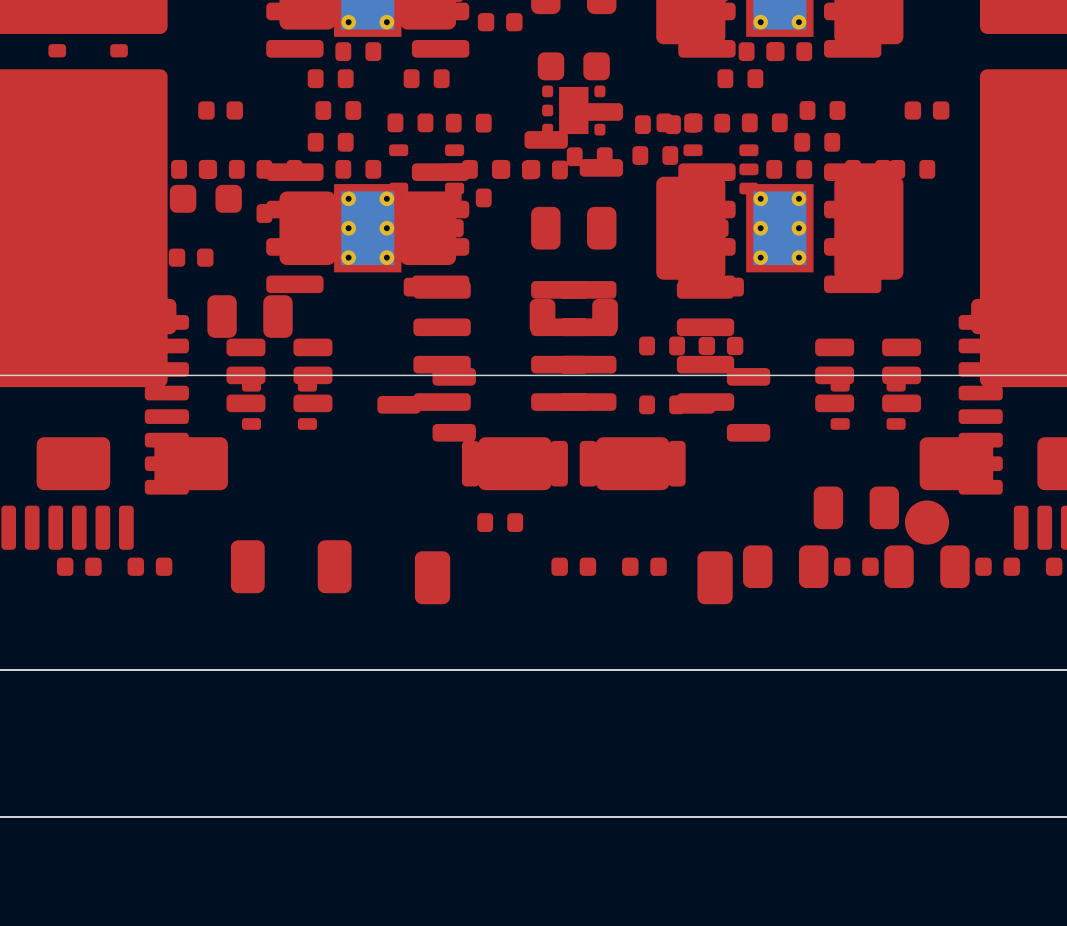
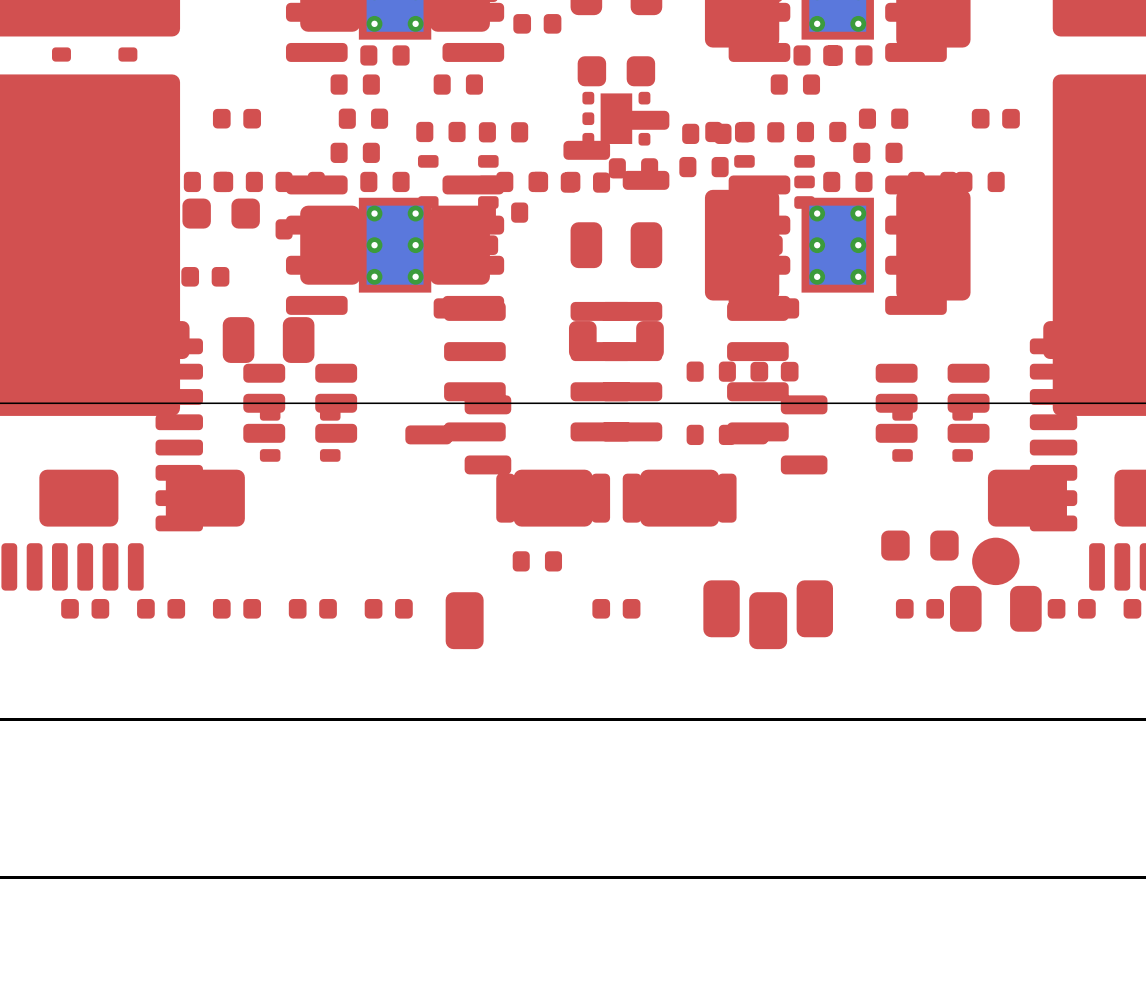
part footprint: [813, 486, 900, 530] -> [881, 530, 959, 561]
part footprint: [230, 540, 352, 594] -> [288, 599, 337, 619]
part: none -> (236, 608)
part: none -> (388, 608)
part: (644, 566) -> none
part: none -> (768, 608)
part: (785, 566) -> none

